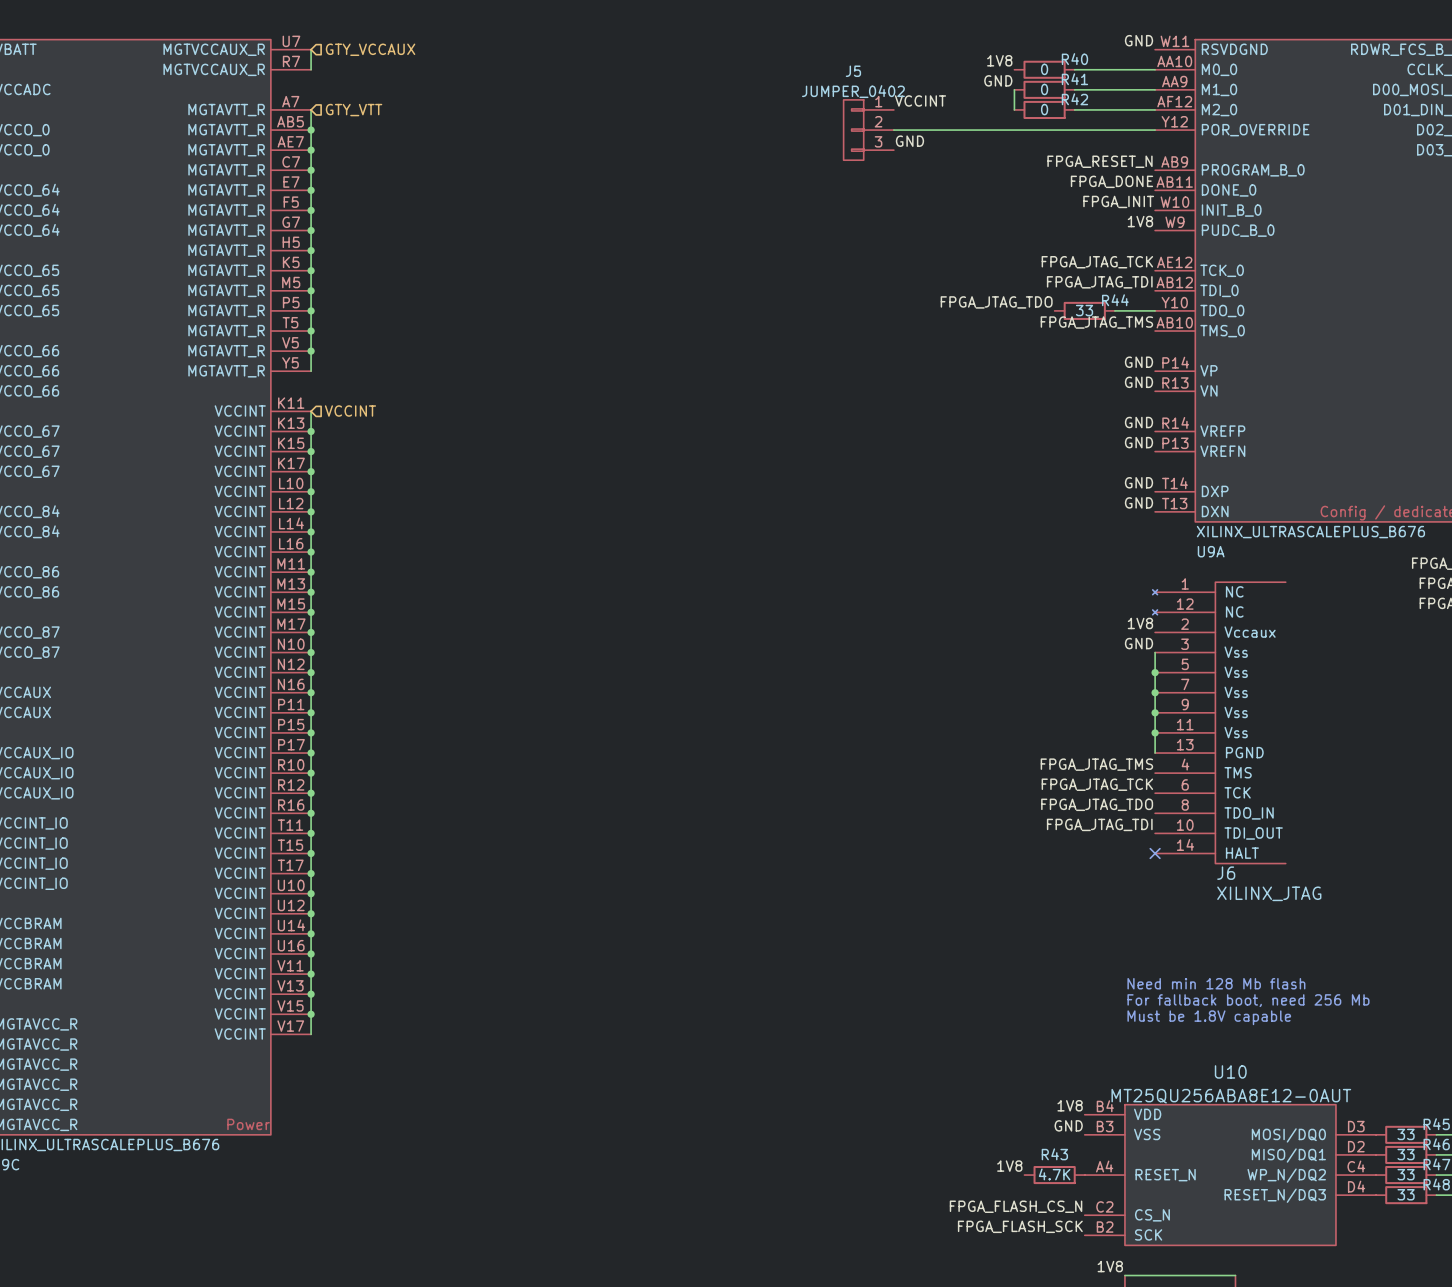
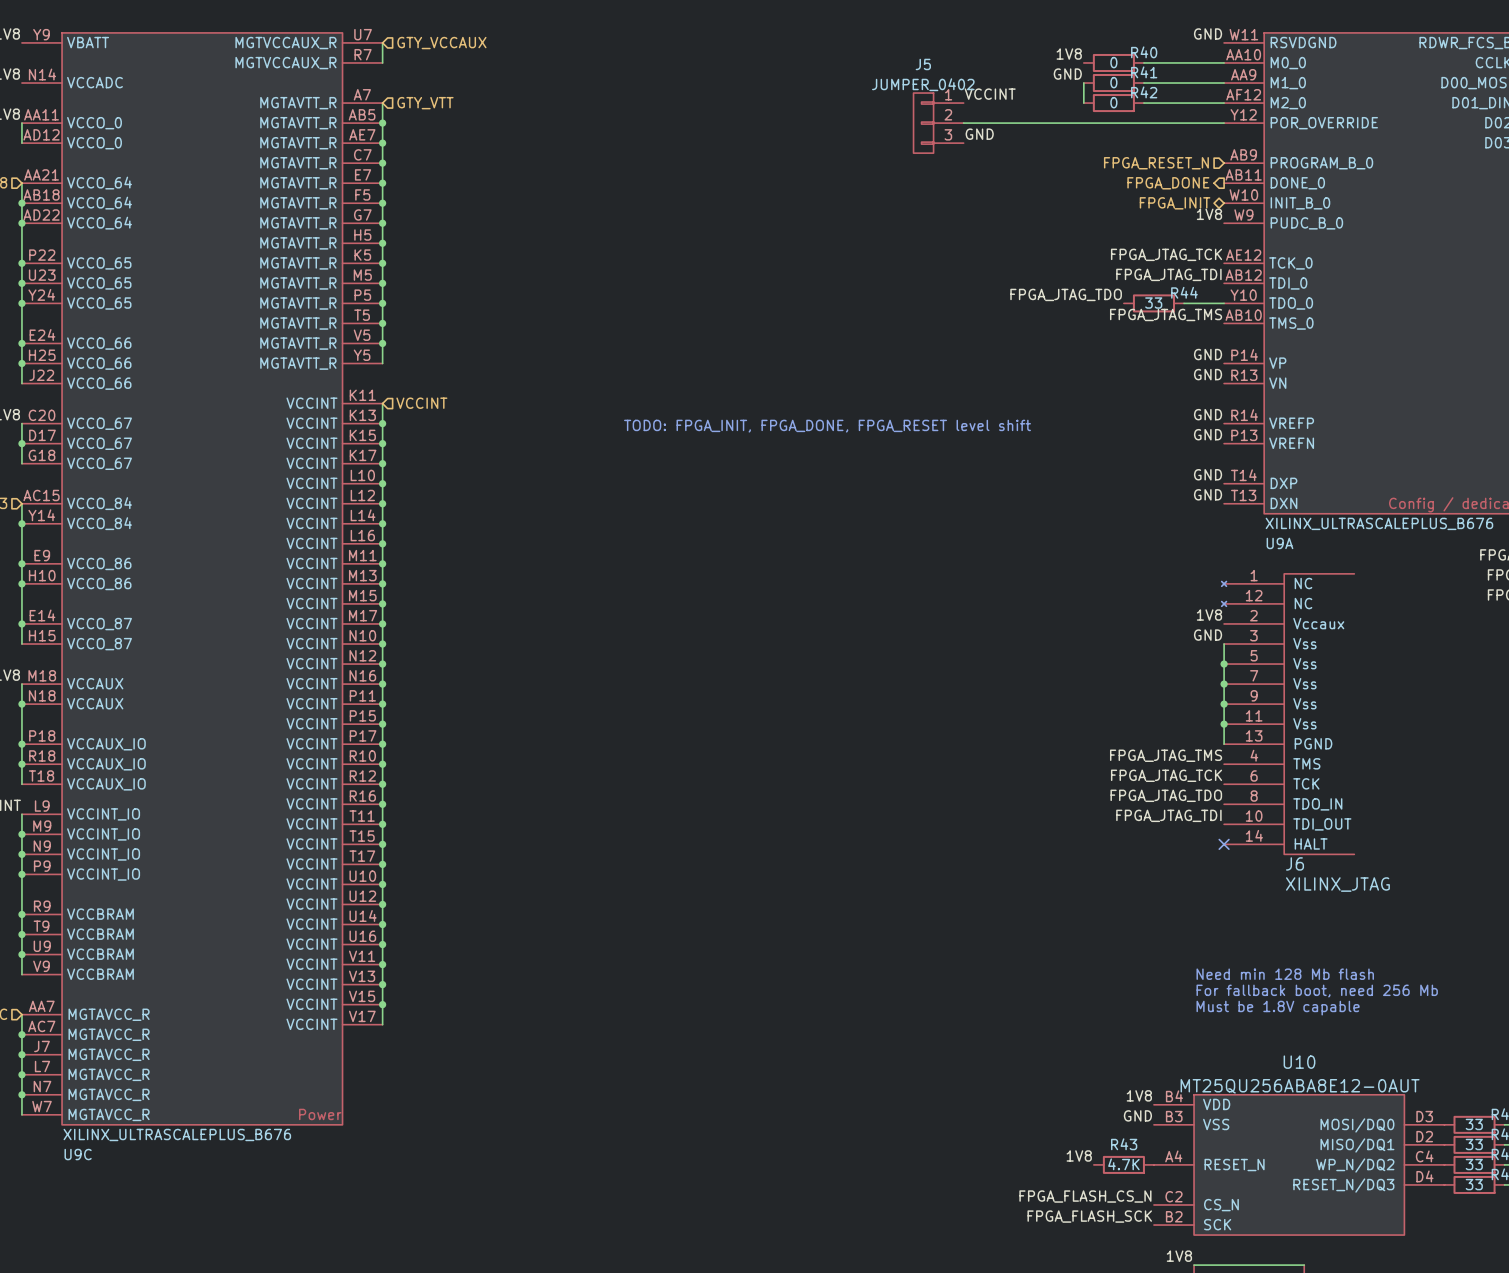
label: FPGA_RESET_N (1100, 161) -> none
hierarchical label: none -> FPGA_RESET_N (1156, 163)
label: FPGA_DONE (1111, 181) -> none
hierarchical label: none -> FPGA_DONE (1168, 183)
label: FPGA_INIT (1118, 201) -> none
hierarchical label: none -> FPGA_INIT (1175, 203)
text: none -> TODO: FPGA_INIT, FPGA_DONE, FPGA_RESET level shift (827, 426)

